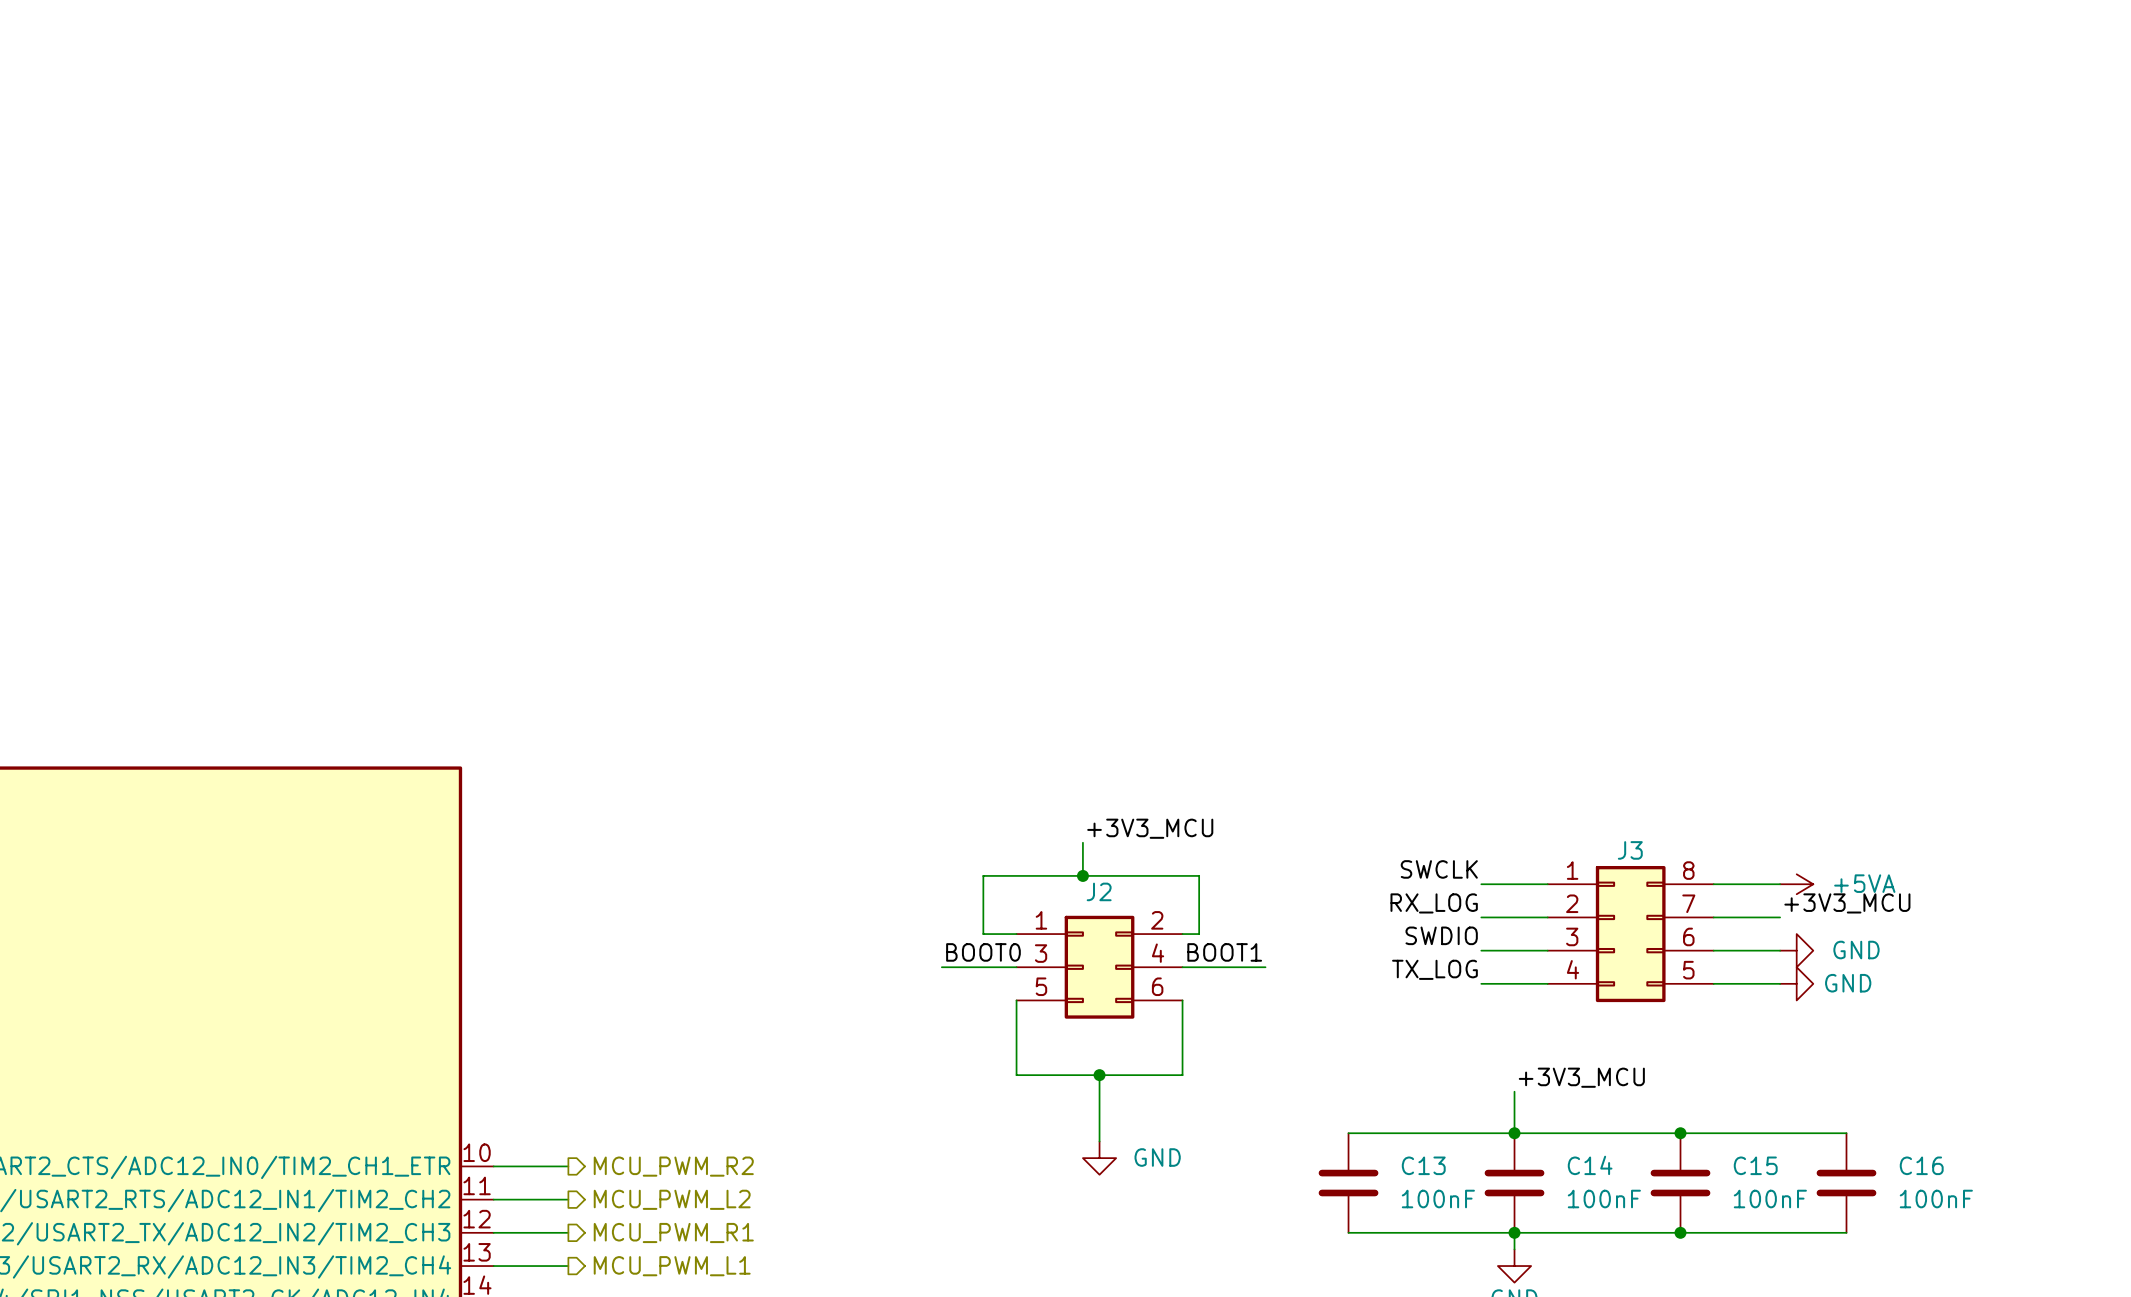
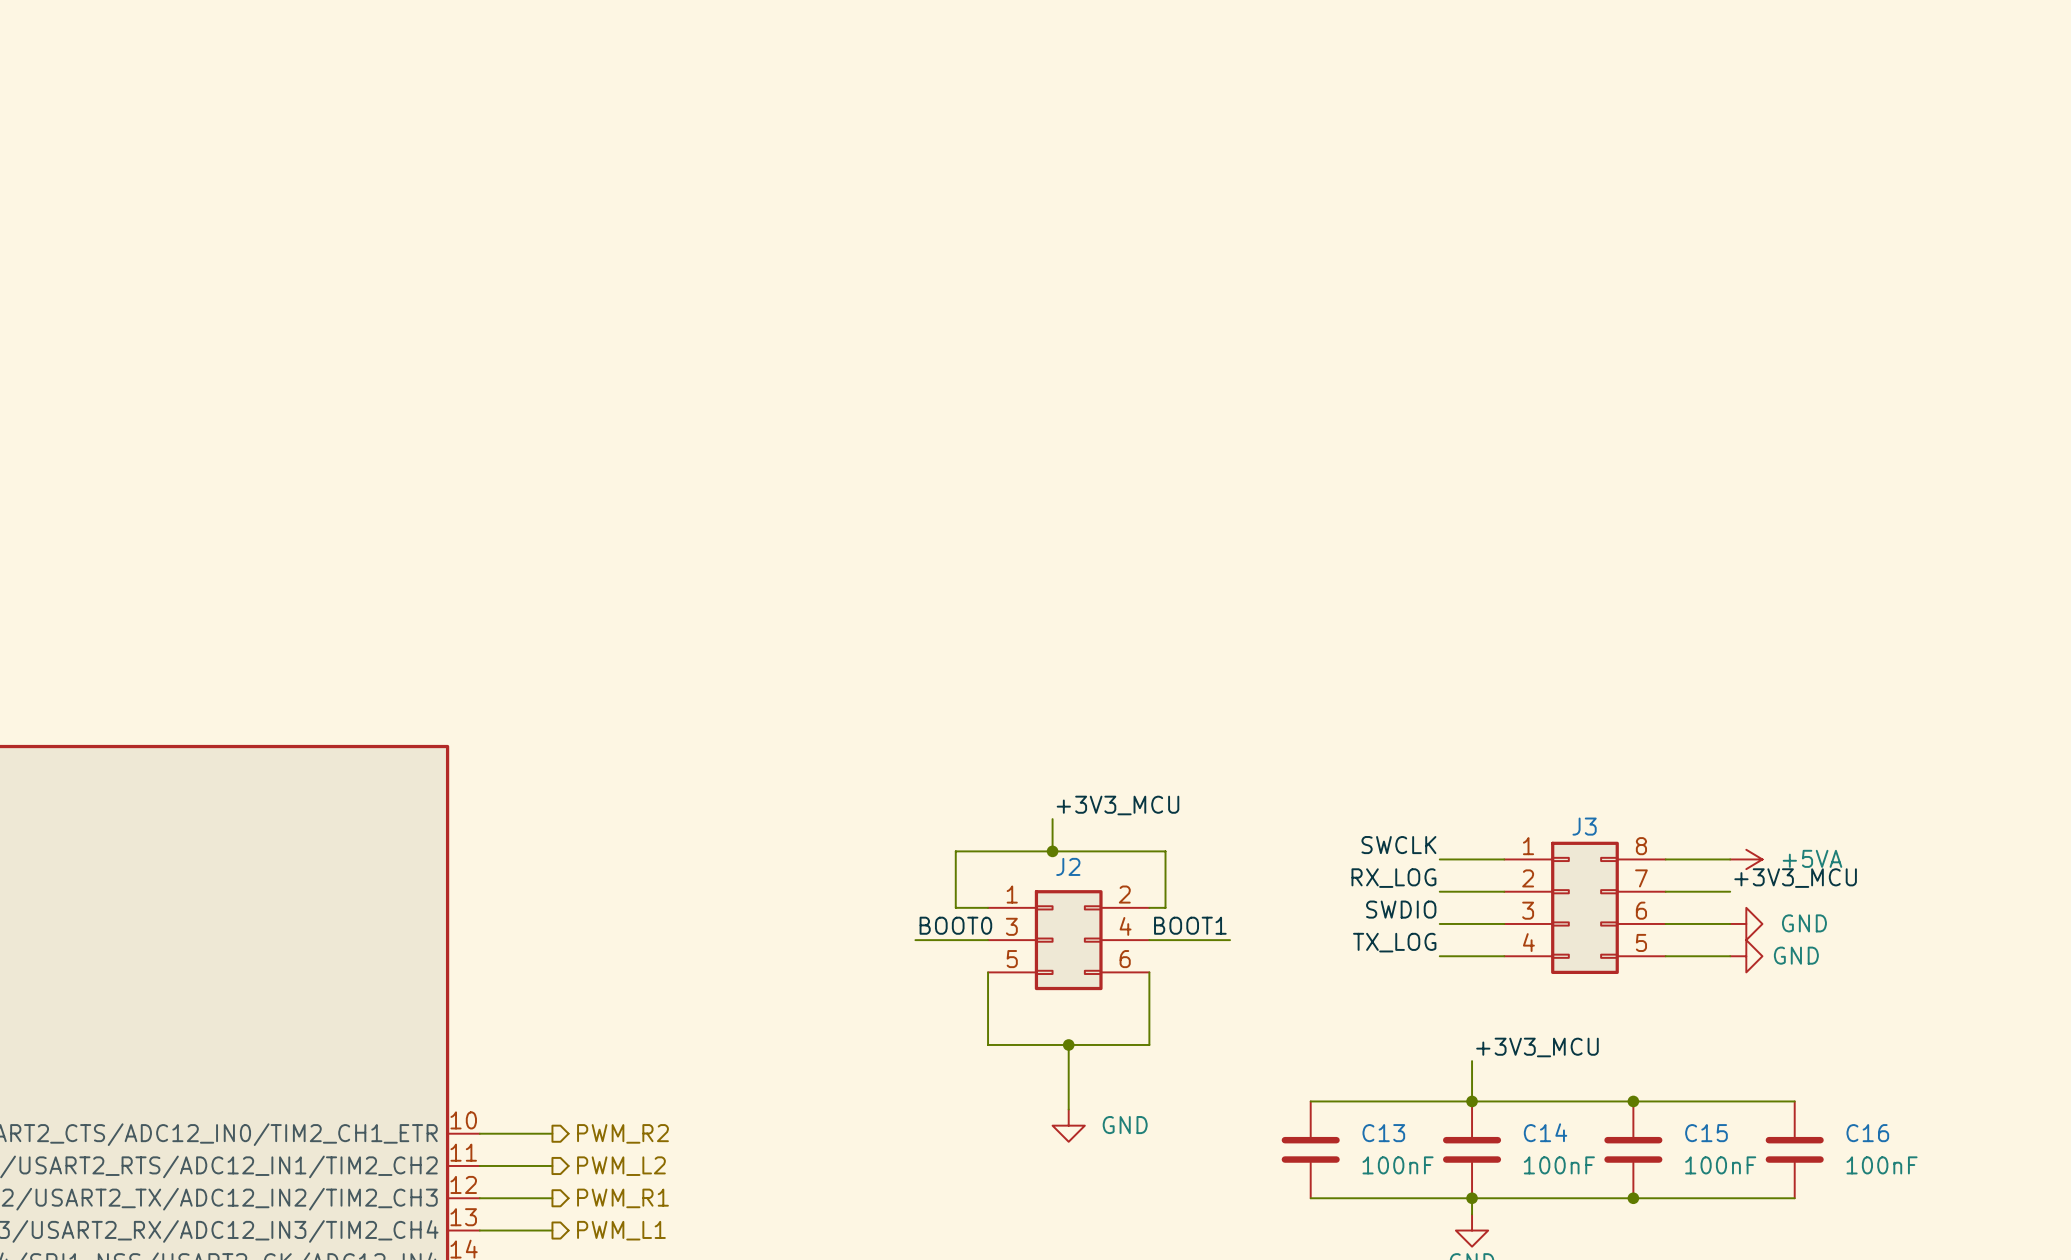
hierarchical label: MCU_PWM_R2 (673, 1166) -> PWM_R2 (622, 1133)
hierarchical label: MCU_PWM_L2 (672, 1199) -> PWM_L2 (621, 1166)
hierarchical label: MCU_PWM_R1 (673, 1232) -> PWM_R1 (622, 1198)
hierarchical label: MCU_PWM_L1 (672, 1266) -> PWM_L1 (621, 1230)

